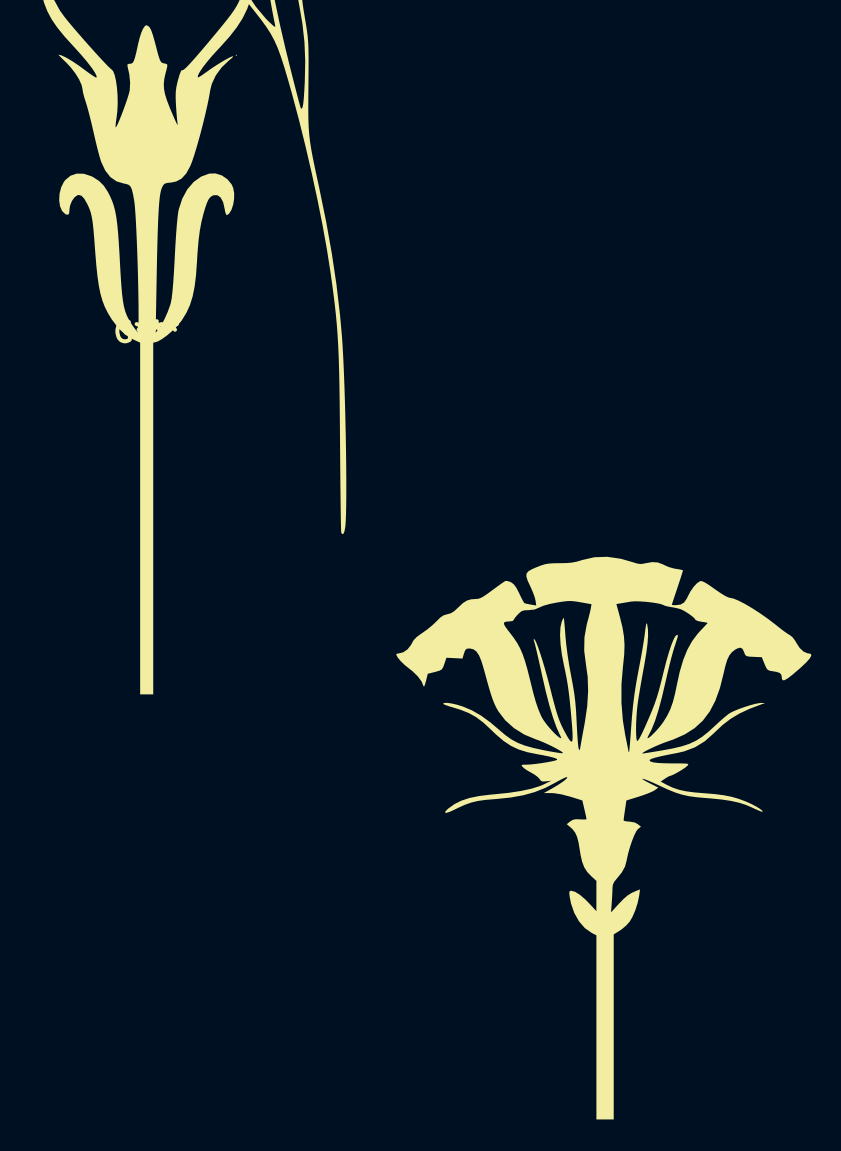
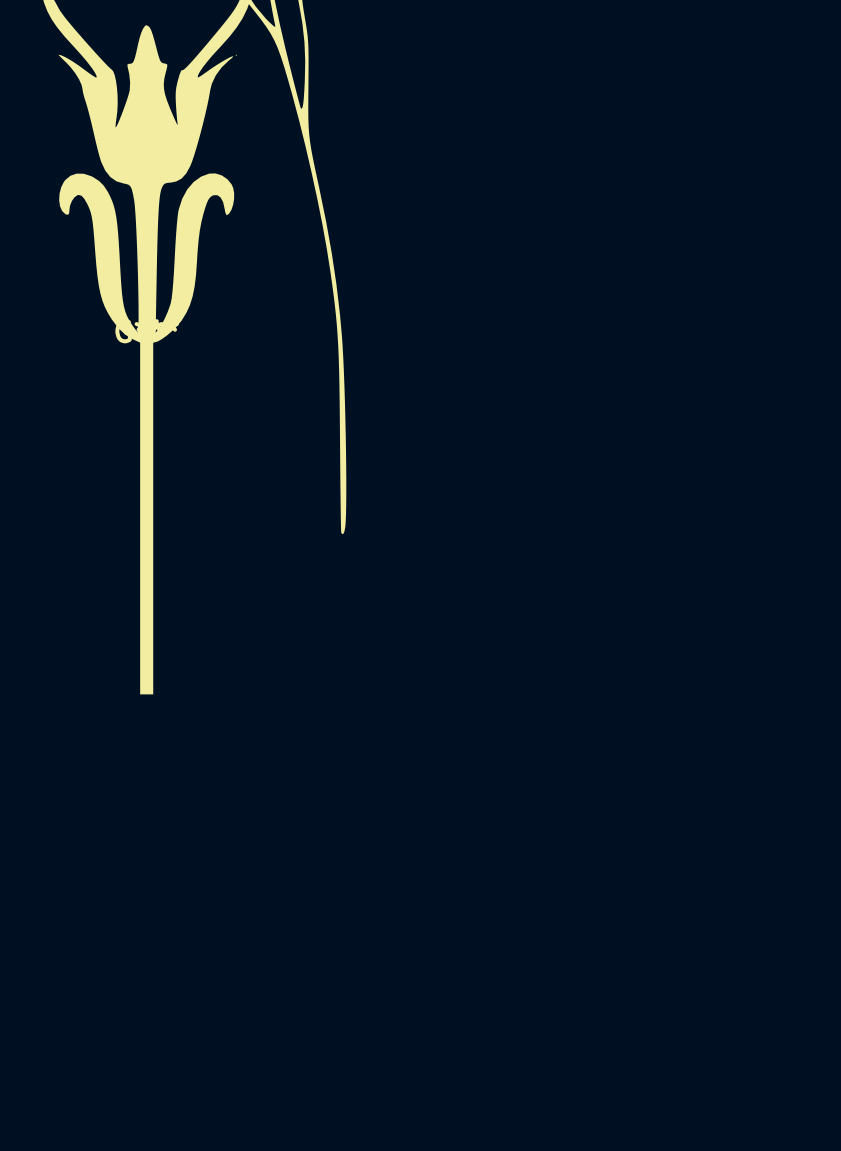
drawing: [396, 556, 812, 1120] -> none

